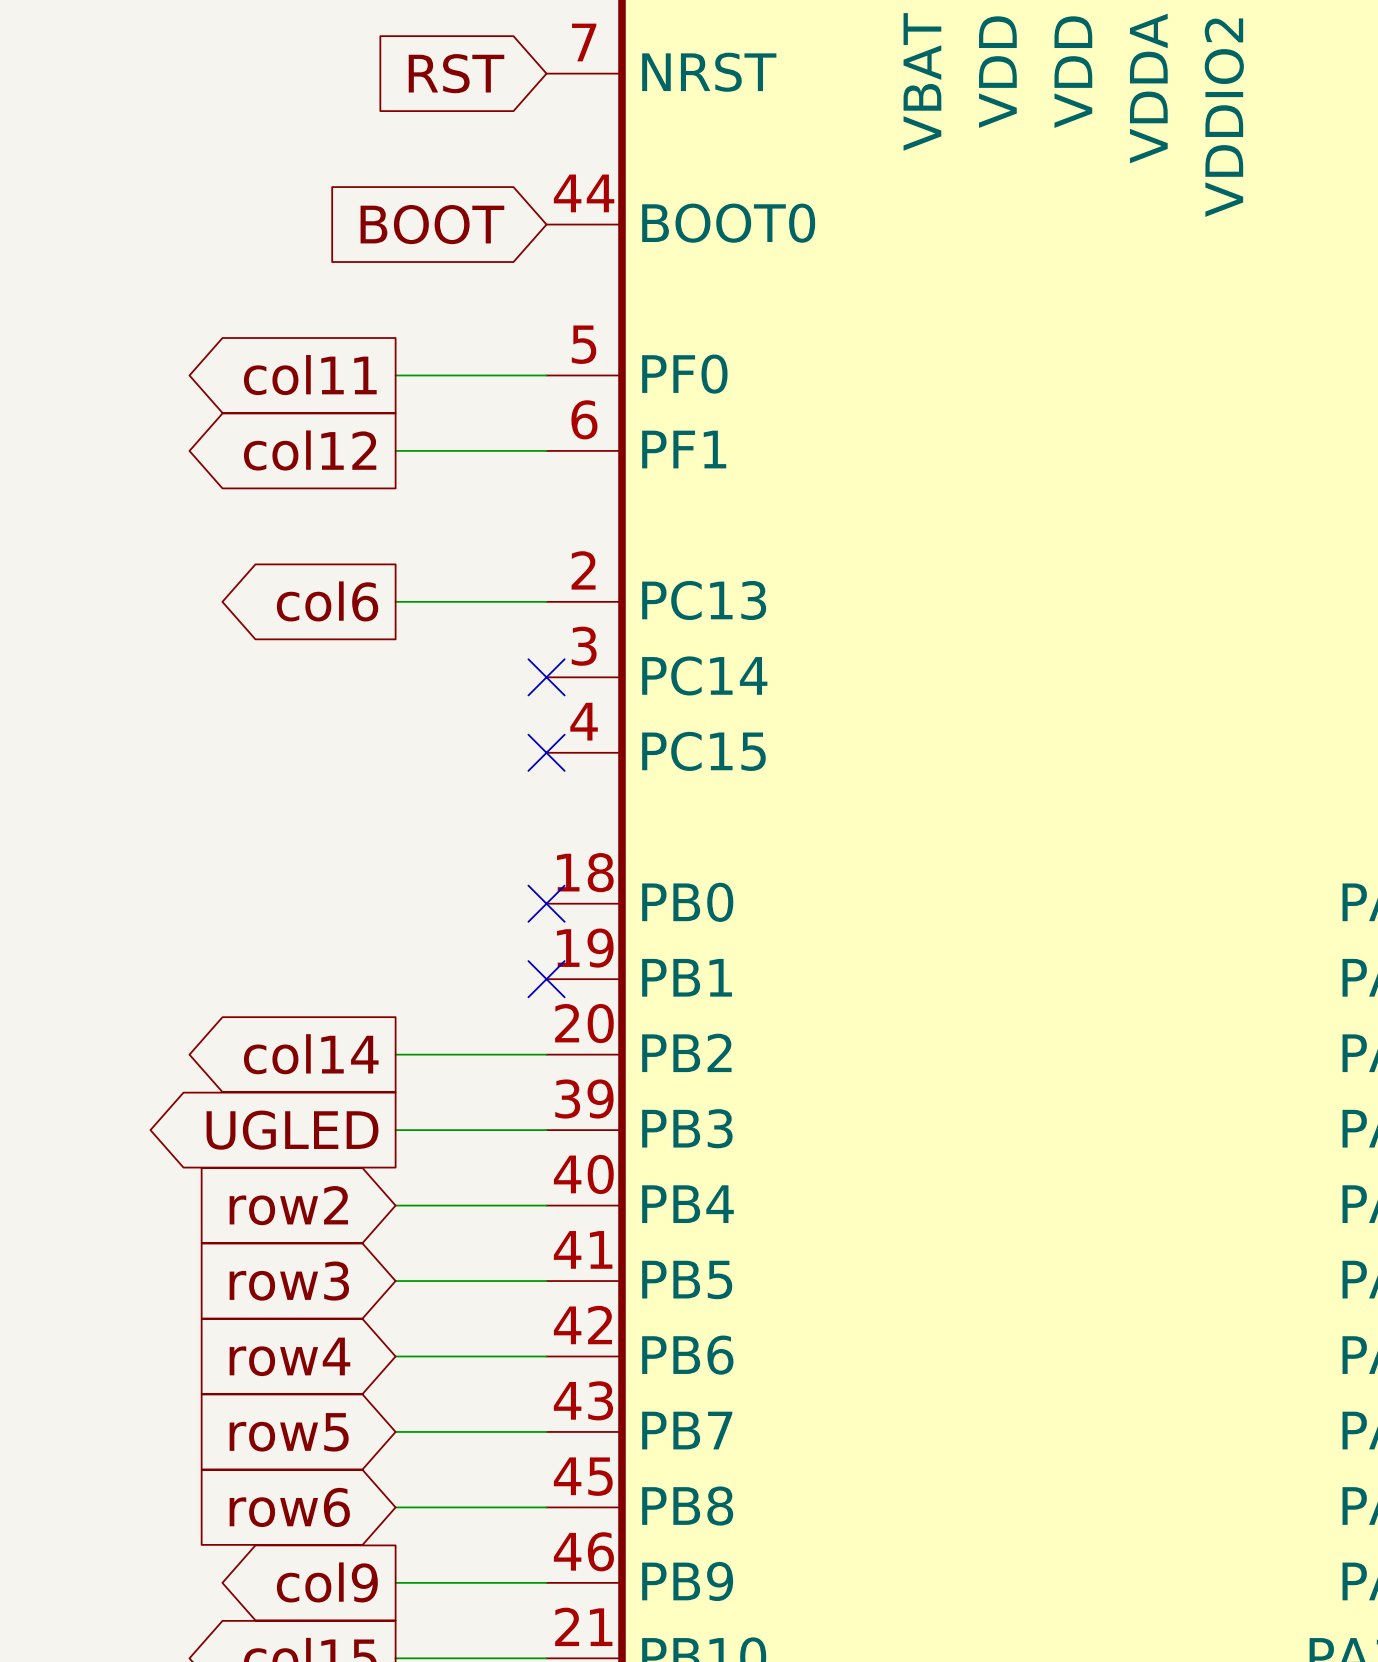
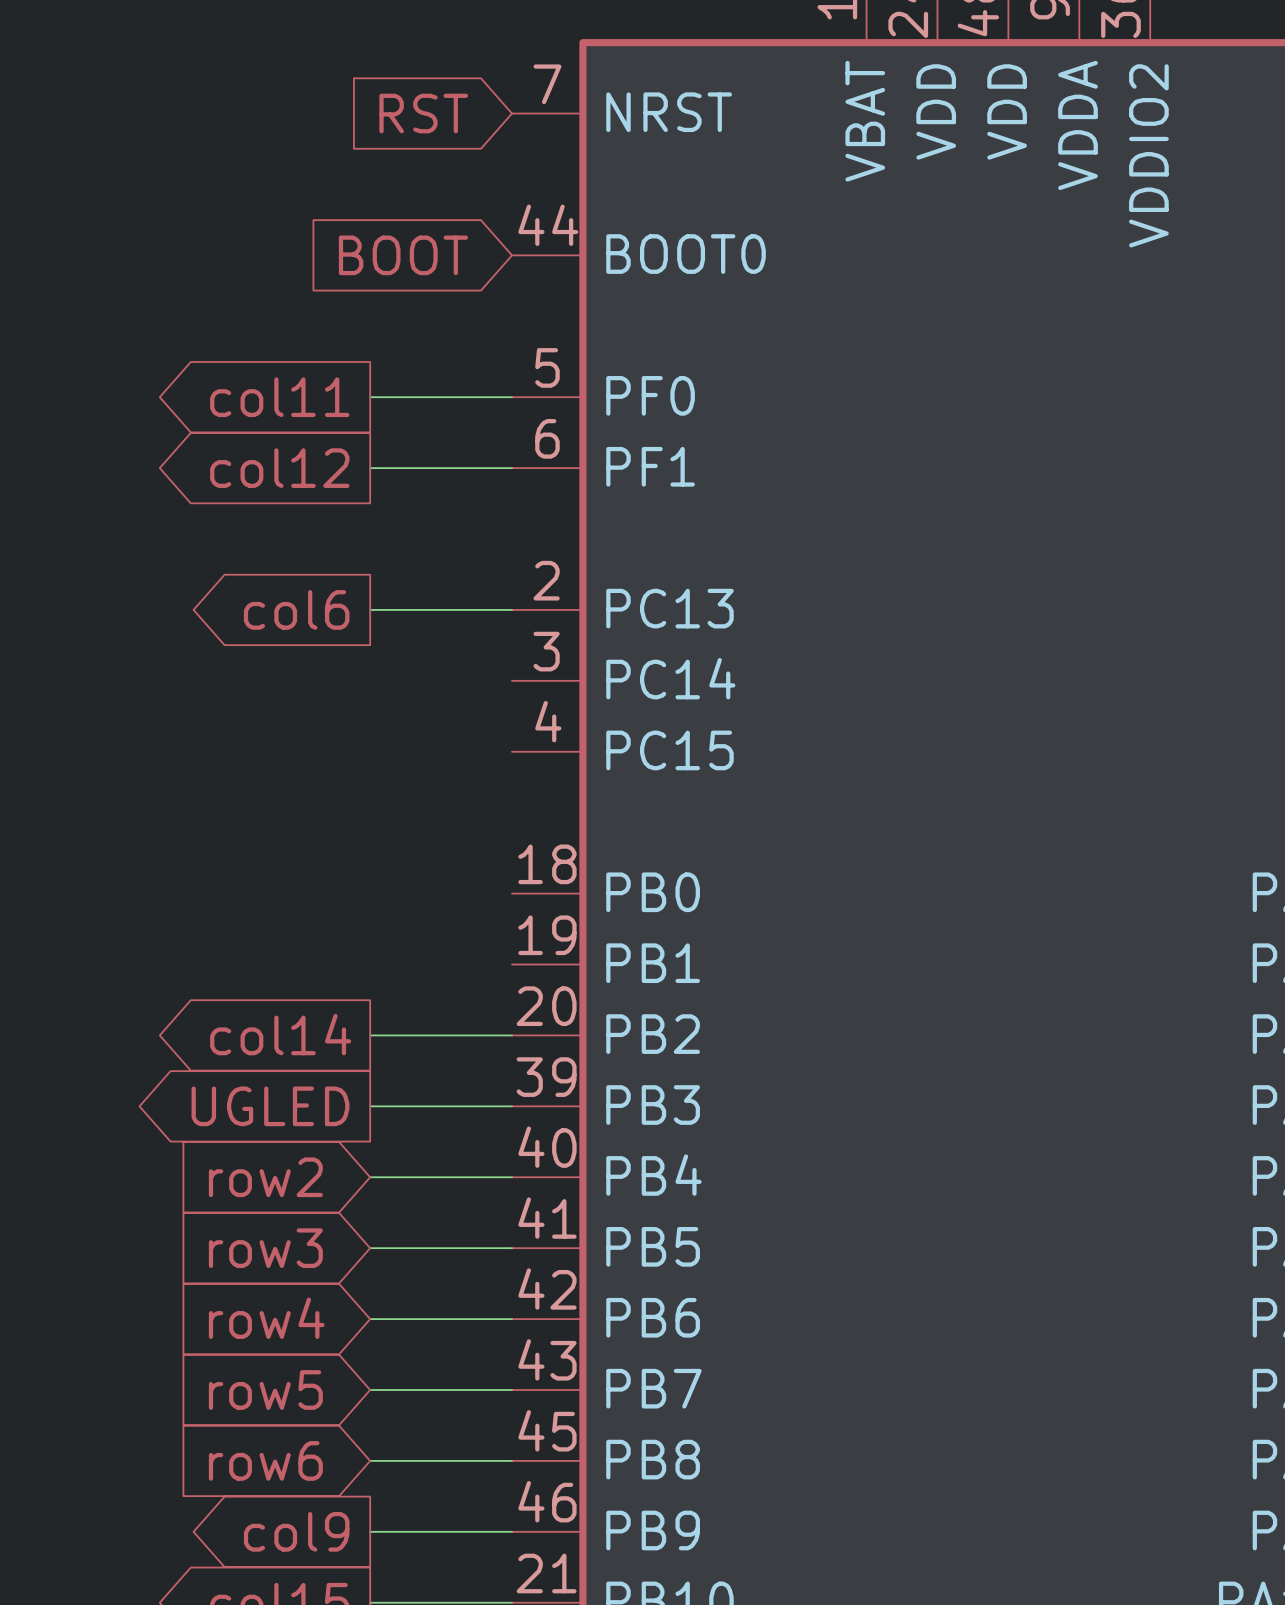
no-connect mark: (546, 677) -> none
no-connect mark: (546, 752) -> none
no-connect mark: (546, 903) -> none
no-connect mark: (546, 979) -> none

